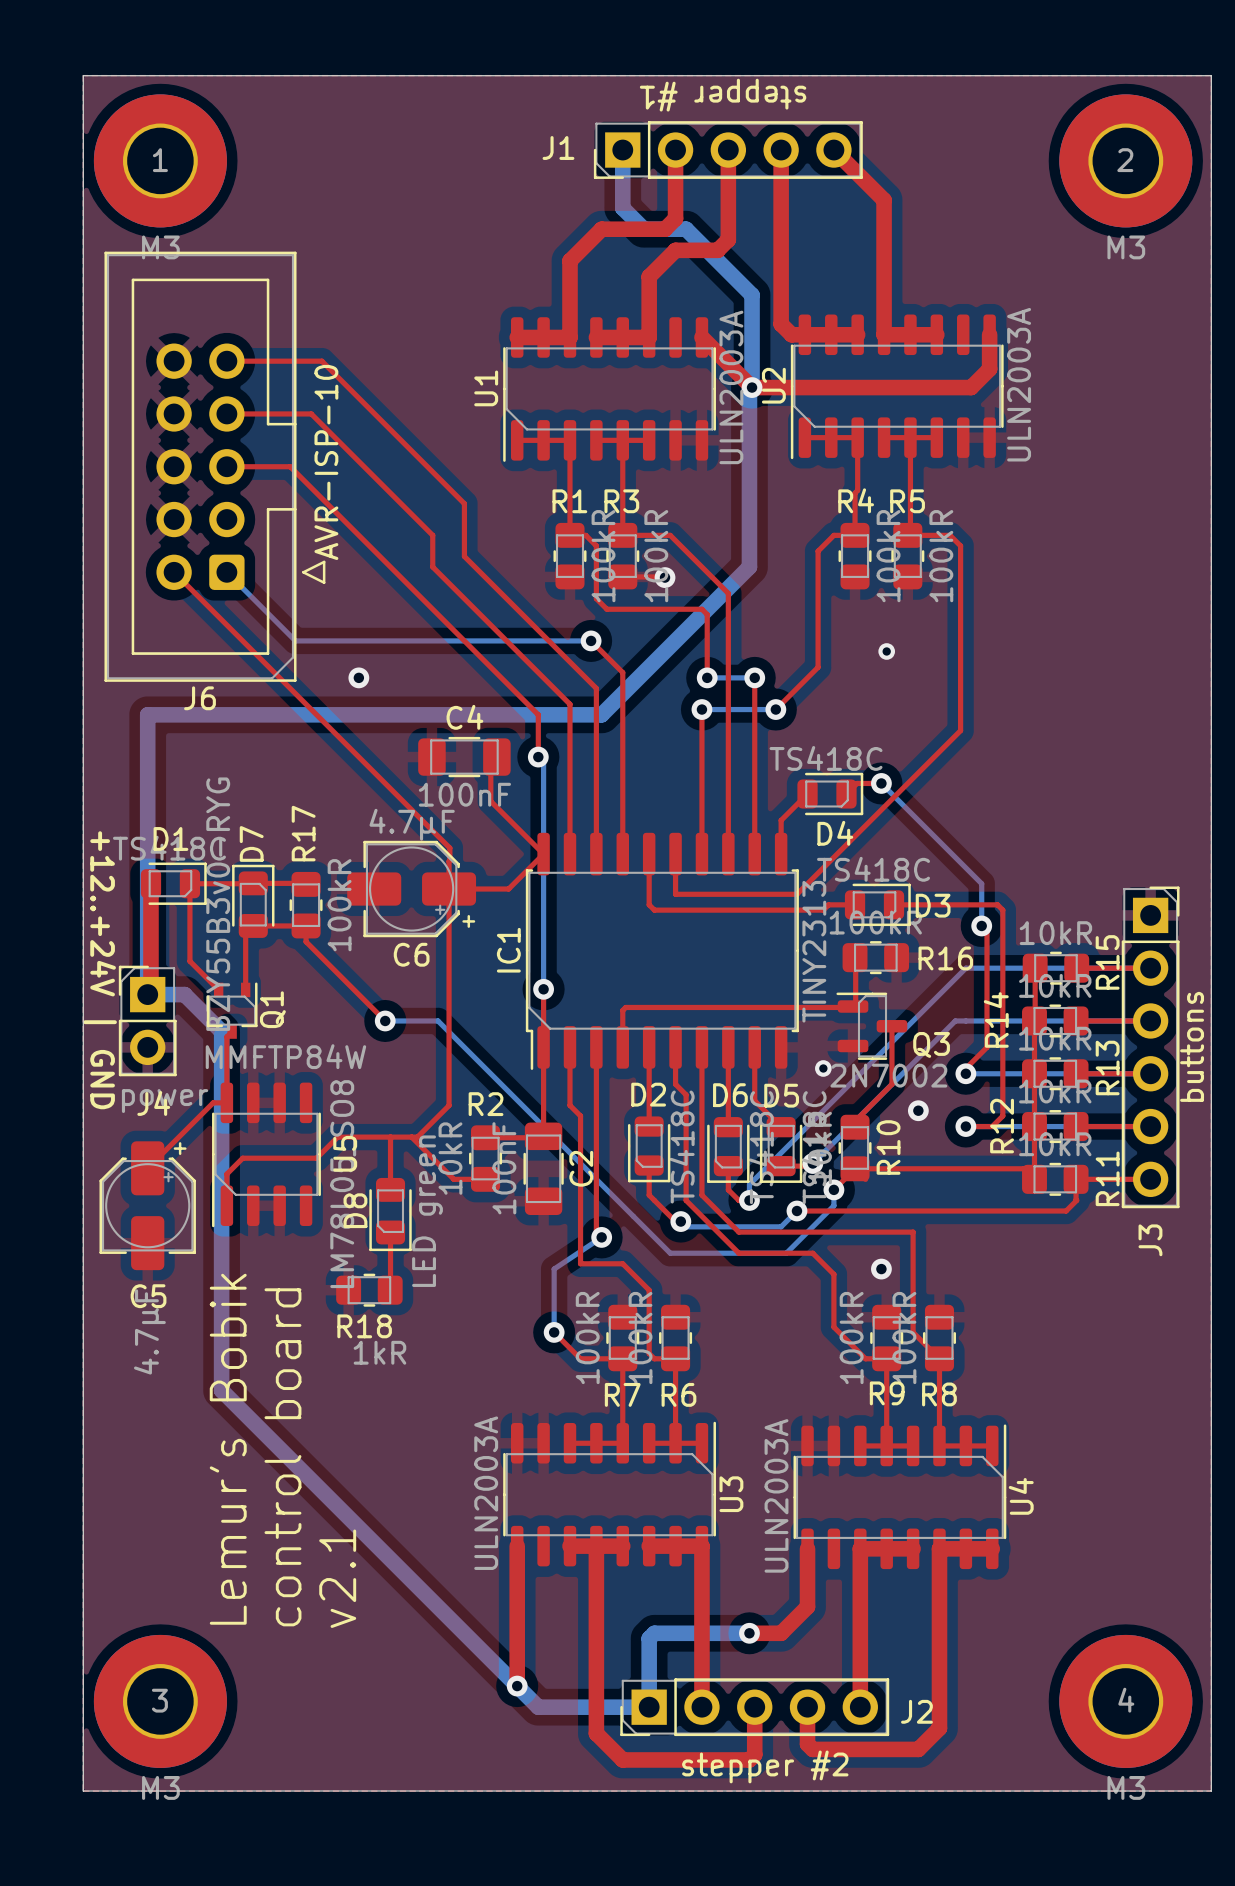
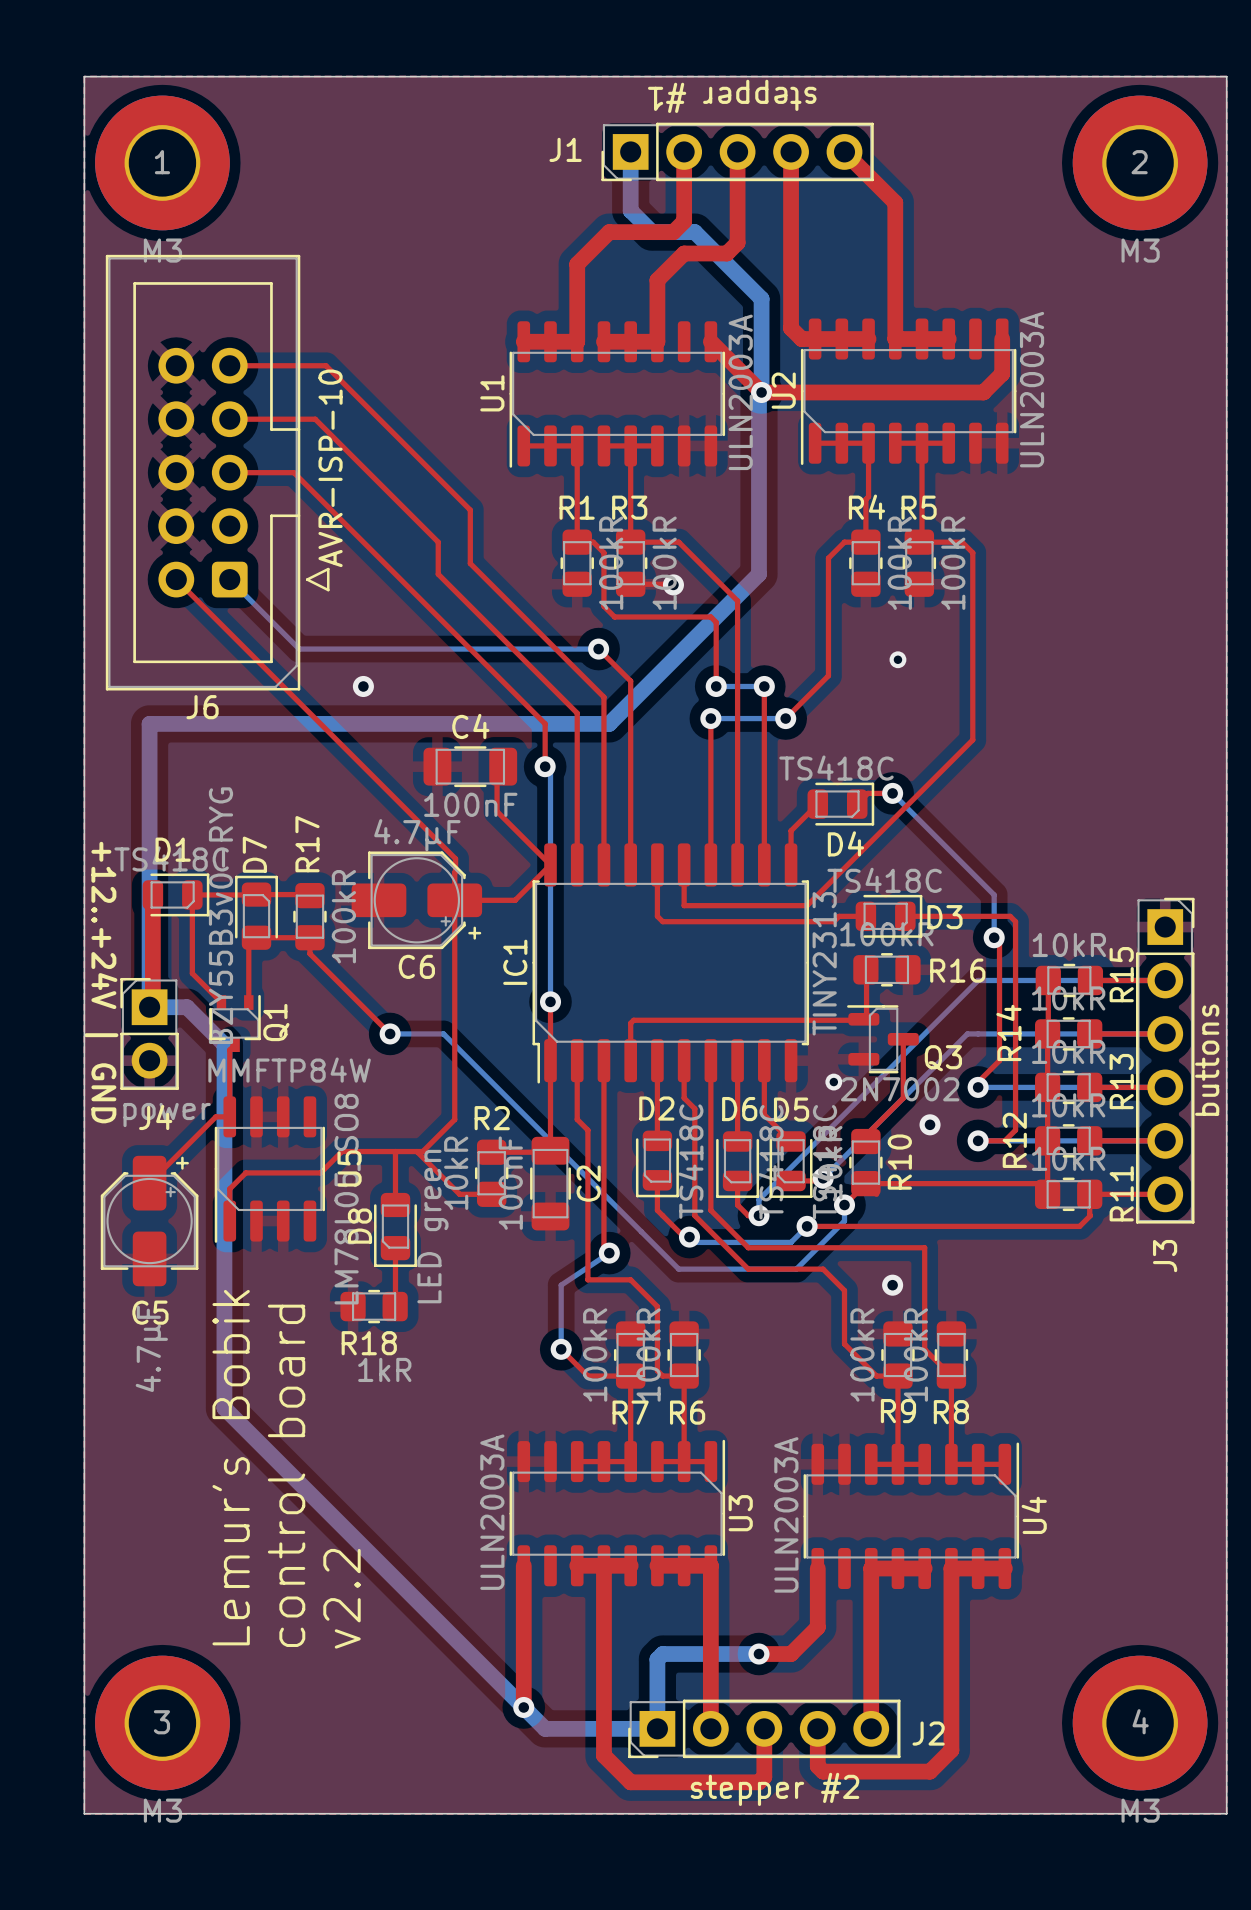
text: v2.1 (337, 1578) -> v2.2 (341, 1598)

